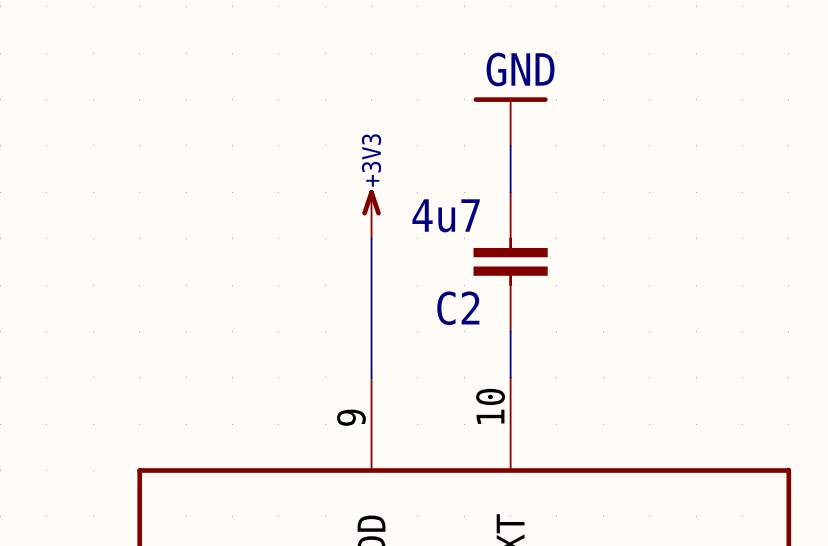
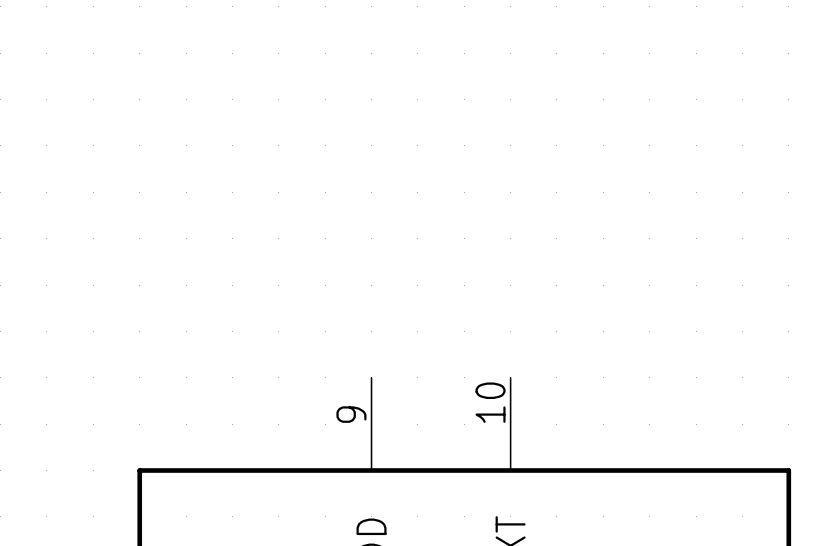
power symbol: GND (510, 121) -> none
wire: (510, 145) (510, 192) -> none
power symbol: +3V3 (371, 214) -> none
wire: (371, 238) (371, 377) -> none
C2: 4u7 (510, 261) -> none
wire: (510, 331) (510, 377) -> none

